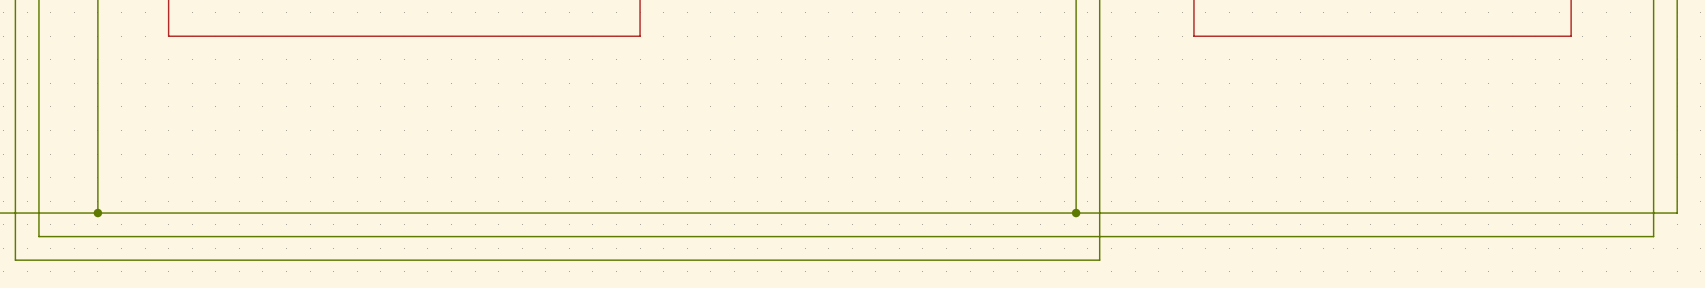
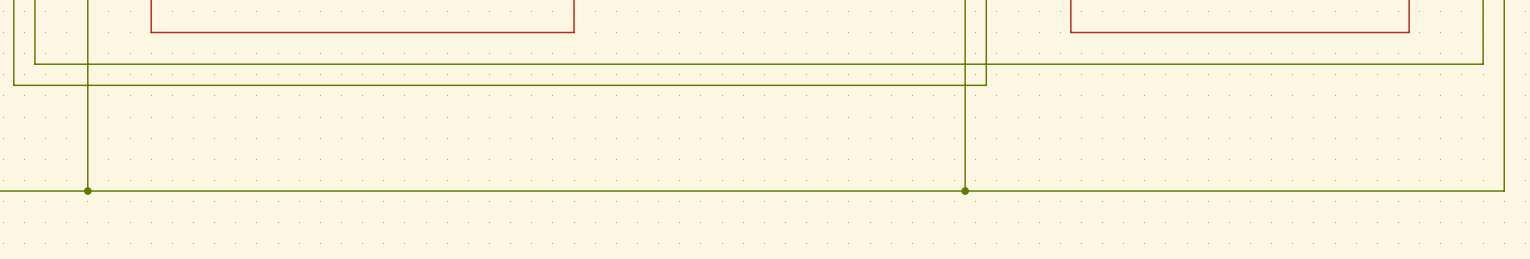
wire: (38, 71) (38, 236) (1653, 236) (1653, 71) -> (34, 64) (1483, 64)
wire: (15, 95) (15, 260) (1099, 260) (1099, 95) -> (13, 85) (986, 85)

